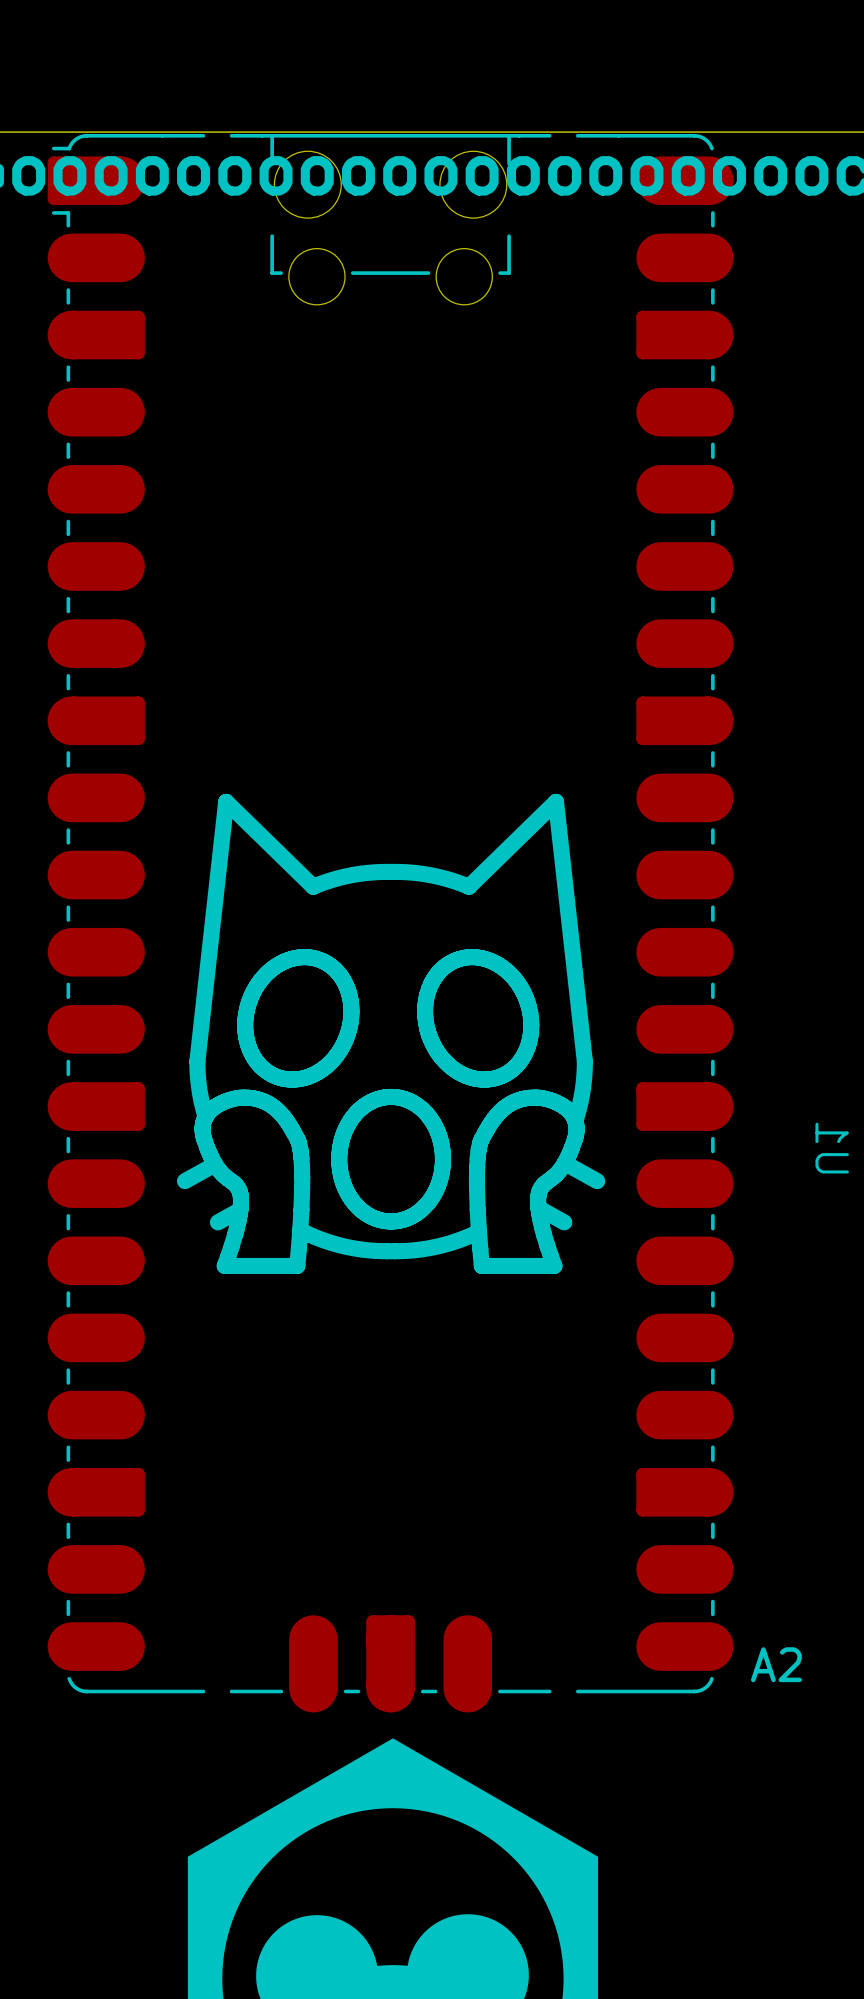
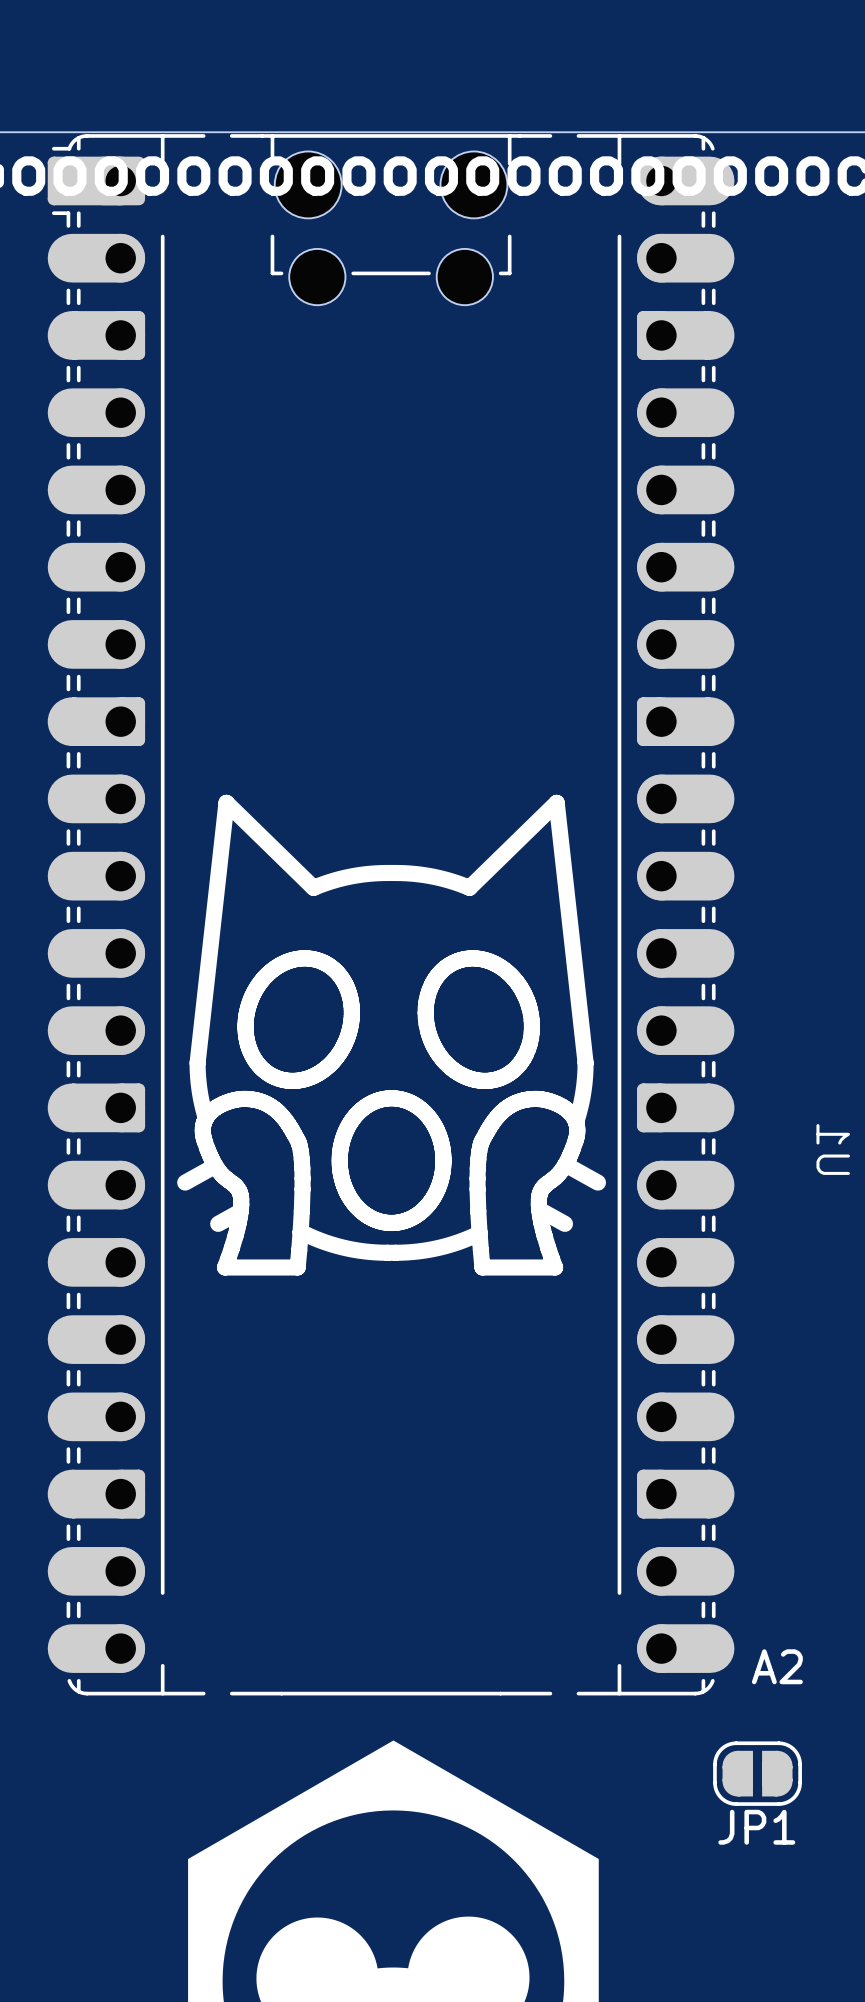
A2 footprint: [47, 133, 734, 1713] -> [47, 134, 735, 1696]
JP1: none -> (757, 1773)

